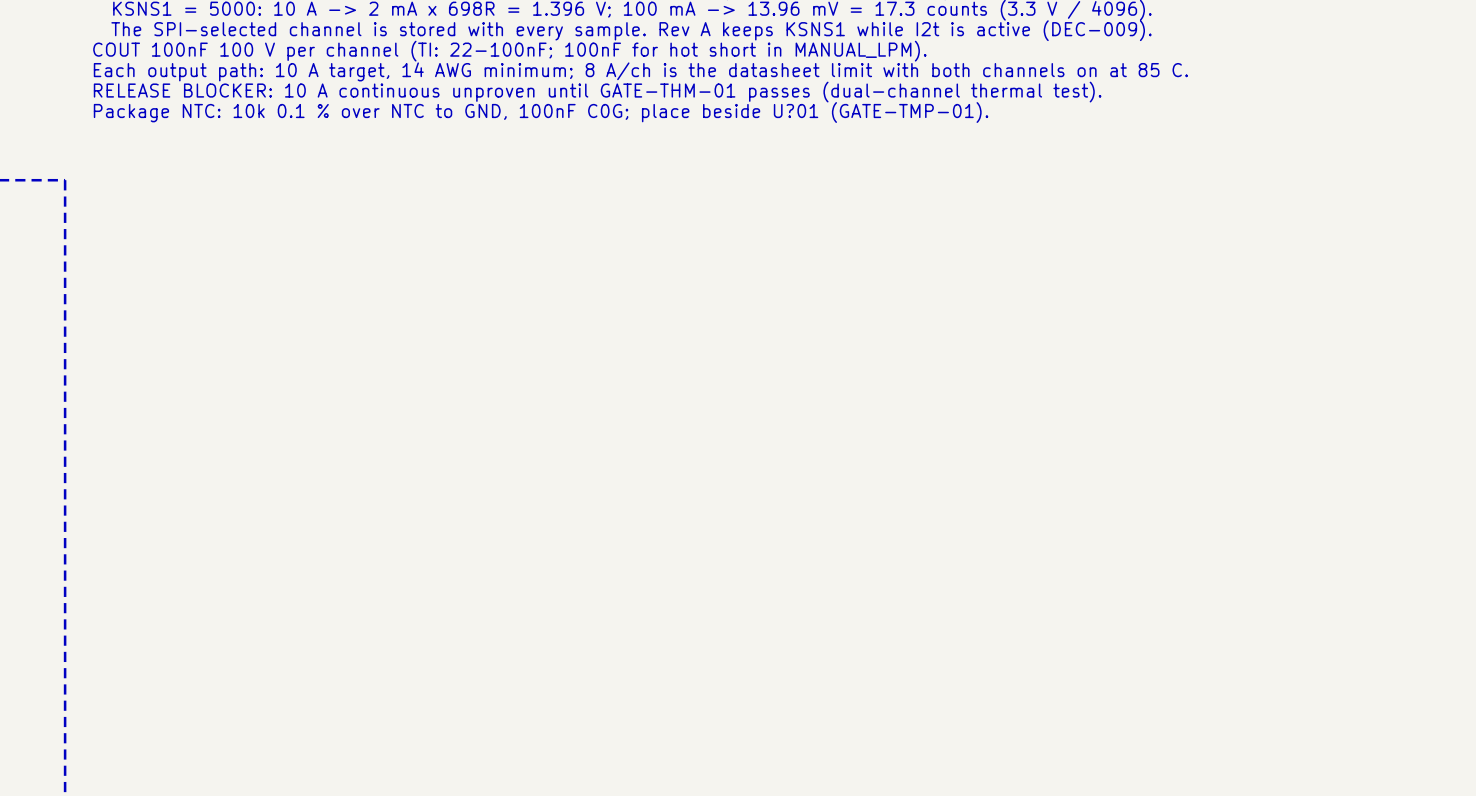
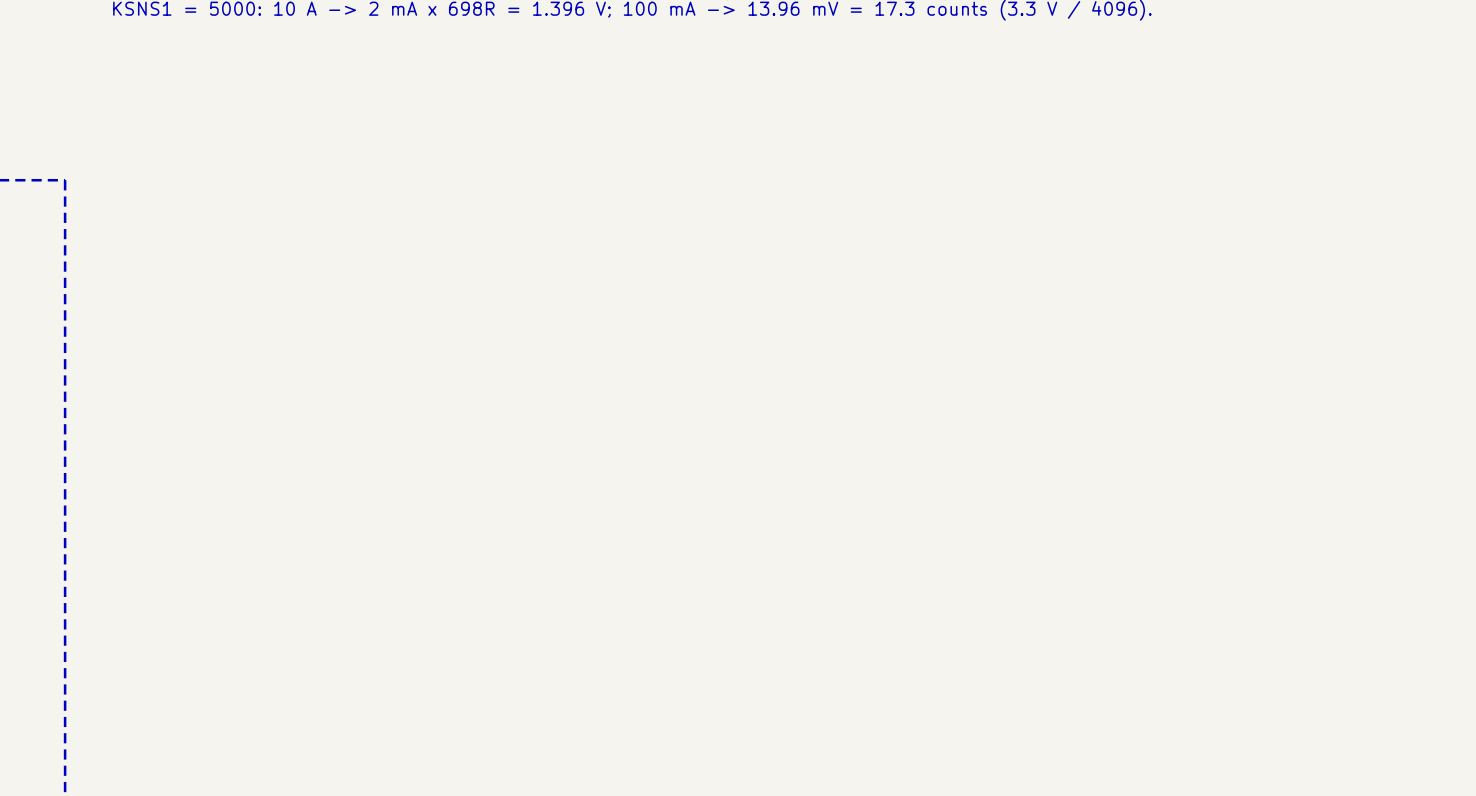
text: The SPI-selected channel is stored with every sample. Rev A keeps KSNS1 while I2t is active (DEC-009). (631, 30) -> none
text: COUT 100nF 100 V per channel (TI: 22-100nF; 100nF for hot short in MANUAL_LPM). (509, 51) -> none
text: Each output path: 10 A target, 14 AWG minimum; 8 A/ch is the datasheet limit with both channels on at 85 C. (640, 71) -> none
text: RELEASE BLOCKER: 10 A continuous unproven until GATE-THM-01 passes (dual-channel thermal test). (597, 92) -> none
text: Package NTC: 10k 0.1 % over NTC to GND, 100nF C0G; place beside U?01 (GATE-TMP-01). (541, 112) -> none

